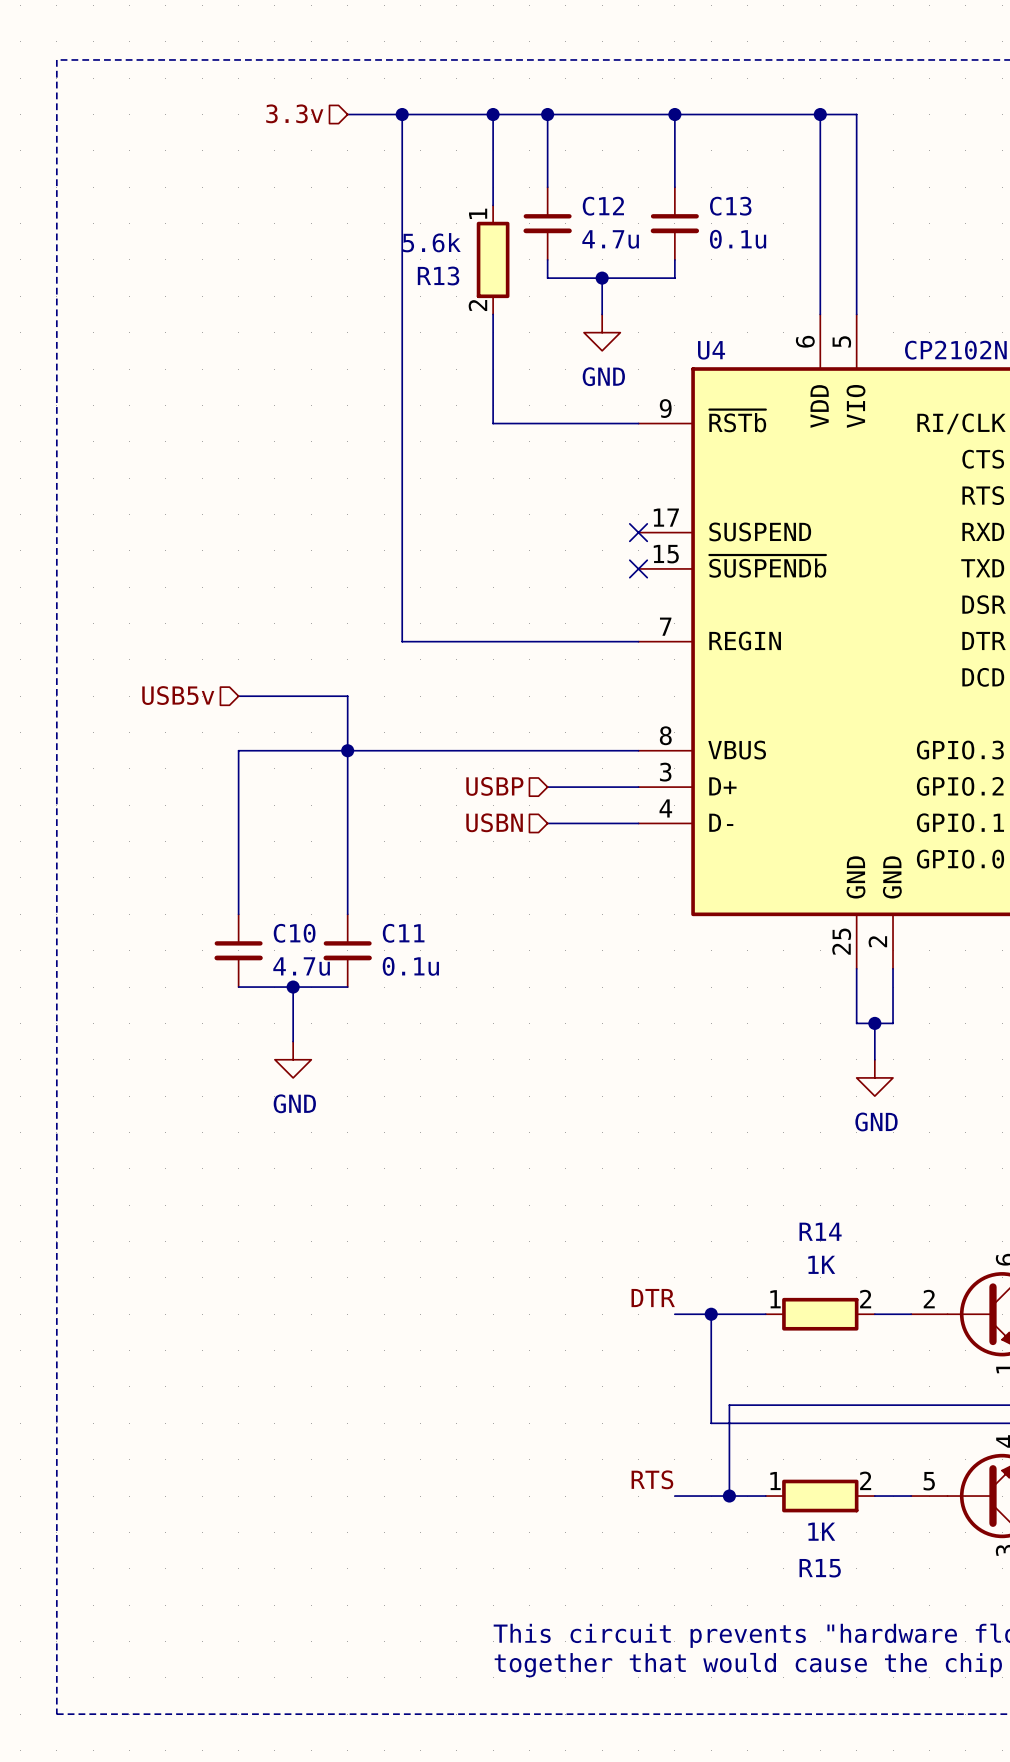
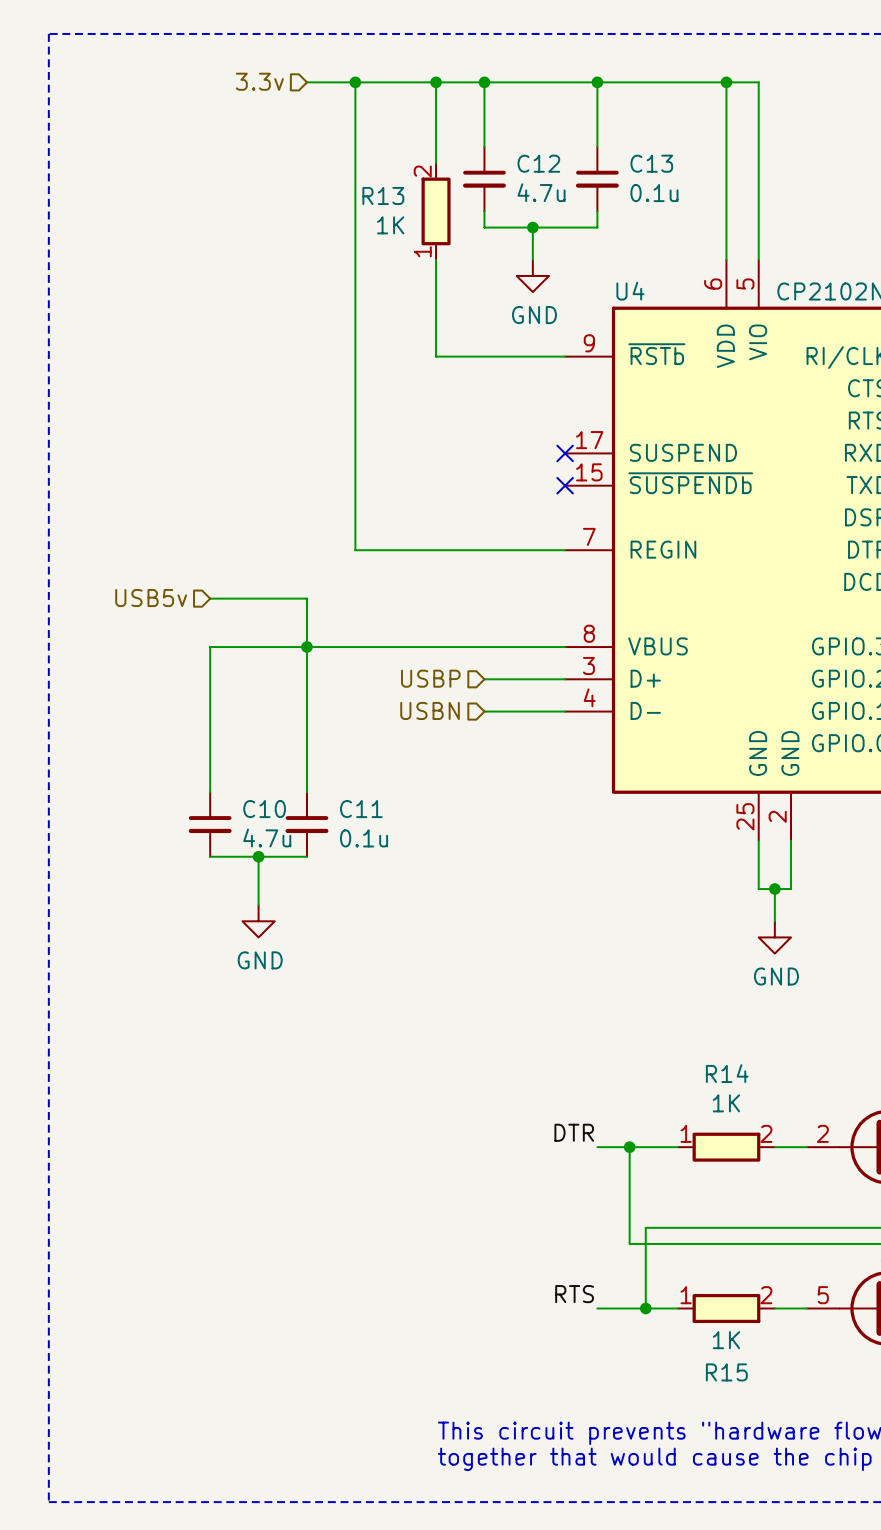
R13 value: 5.6k (431, 242) -> 1K (390, 225)
R13 rotation: 0° (493, 259) -> 180° (436, 211)
R13 name position: R13 (438, 275) -> R13 (383, 195)

